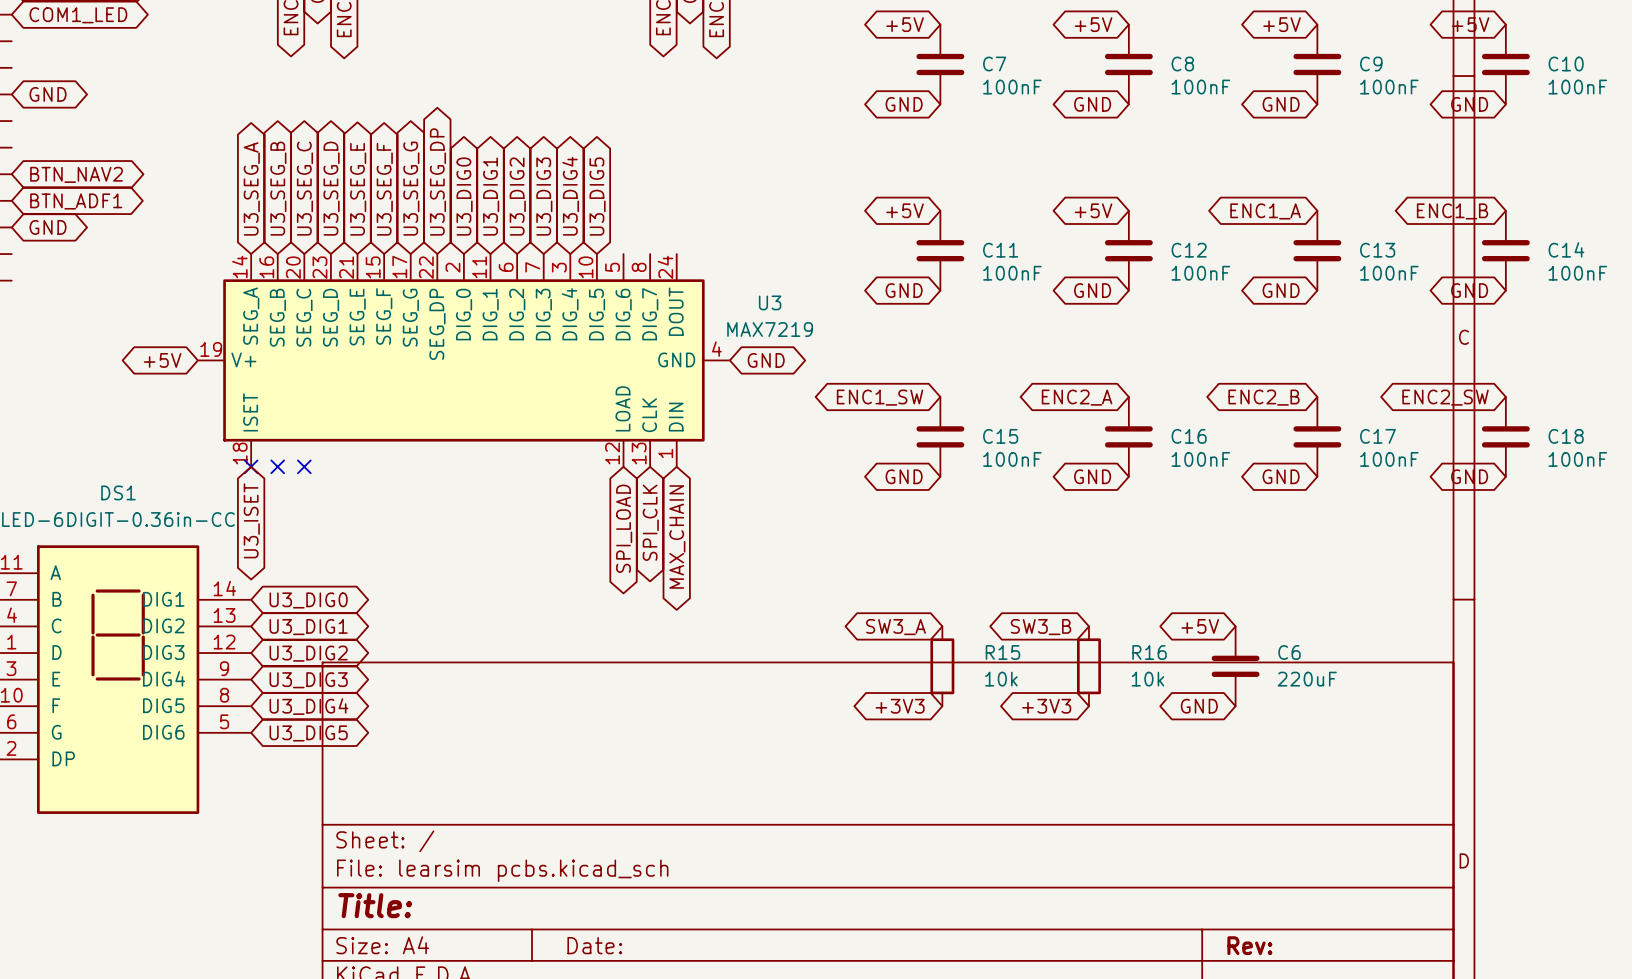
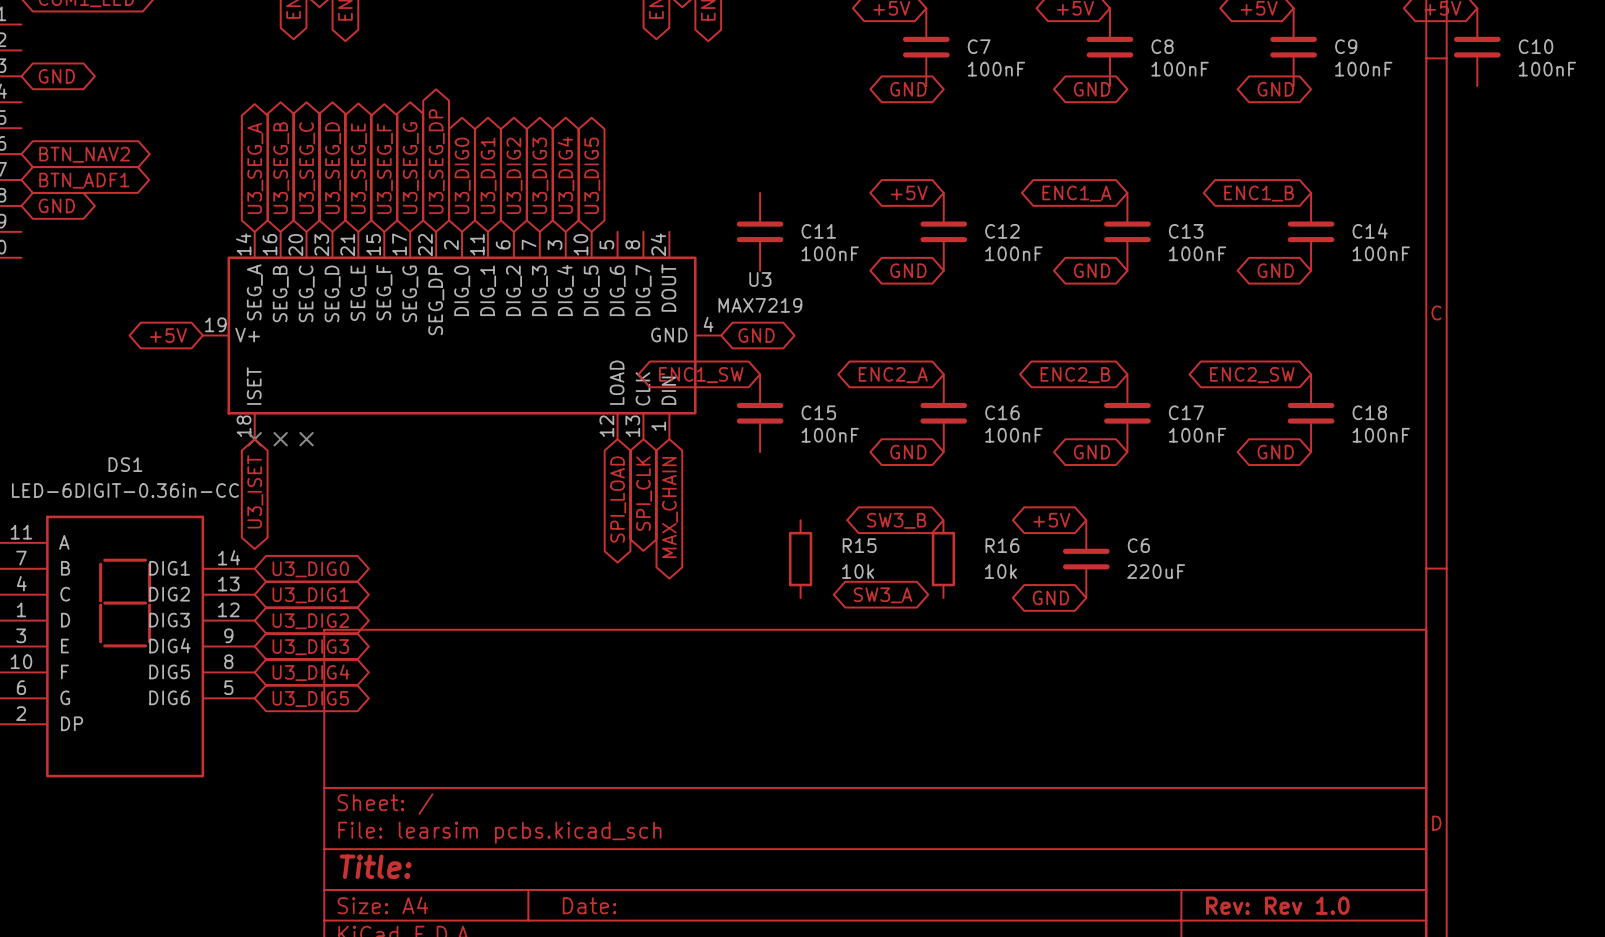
global label position: GND (904, 104) -> GND (908, 89)
global label position: GND (1092, 104) -> GND (1092, 89)
global label position: GND (1281, 104) -> GND (1275, 89)
global label: GND (1469, 104) -> none
global label position: +5V (905, 210) -> +5V (909, 192)
global label: +5V (1093, 210) -> none
global label position: ENC1_A (1265, 211) -> ENC1_A (1076, 193)
global label position: ENC1_B (1452, 211) -> ENC1_B (1259, 193)
C11 position: (940, 250) -> (760, 231)
C12 position: (1128, 250) -> (943, 231)
C13 position: (1317, 250) -> (1127, 231)
C14 position: (1505, 250) -> (1311, 231)
global label position: GND (904, 290) -> GND (908, 270)
global label position: GND (1092, 290) -> GND (1092, 270)
global label position: GND (1281, 290) -> GND (1275, 270)
global label: GND (1469, 290) -> none
global label position: ENC1_SW (880, 397) -> ENC1_SW (701, 375)
global label position: ENC2_A (1077, 397) -> ENC2_A (893, 375)
global label position: ENC2_B (1263, 397) -> ENC2_B (1075, 375)
global label position: ENC2_SW (1445, 397) -> ENC2_SW (1252, 375)
C15 position: (940, 436) -> (760, 413)
C16 position: (1128, 436) -> (943, 413)
C17 position: (1317, 436) -> (1127, 413)
C18 position: (1505, 436) -> (1311, 413)
global label position: GND (904, 476) -> GND (908, 452)
global label position: GND (1092, 476) -> GND (1092, 452)
global label position: GND (1281, 476) -> GND (1275, 452)
global label: GND (1469, 476) -> none
global label position: +5V (1200, 626) -> +5V (1051, 520)
global label position: SW3_B (1040, 627) -> SW3_B (896, 520)
global label: none -> GND (1050, 597)
R15 position: (942, 666) -> (800, 559)
R16 position: (1088, 666) -> (943, 559)
C6 position: (1235, 666) -> (1086, 559)
global label: +3V3 (900, 706) -> none
global label: +3V3 (1046, 706) -> none
global label: GND (1199, 706) -> none
title block: Rev: (1249, 945) -> Rev: Rev 1.0 (1277, 905)

